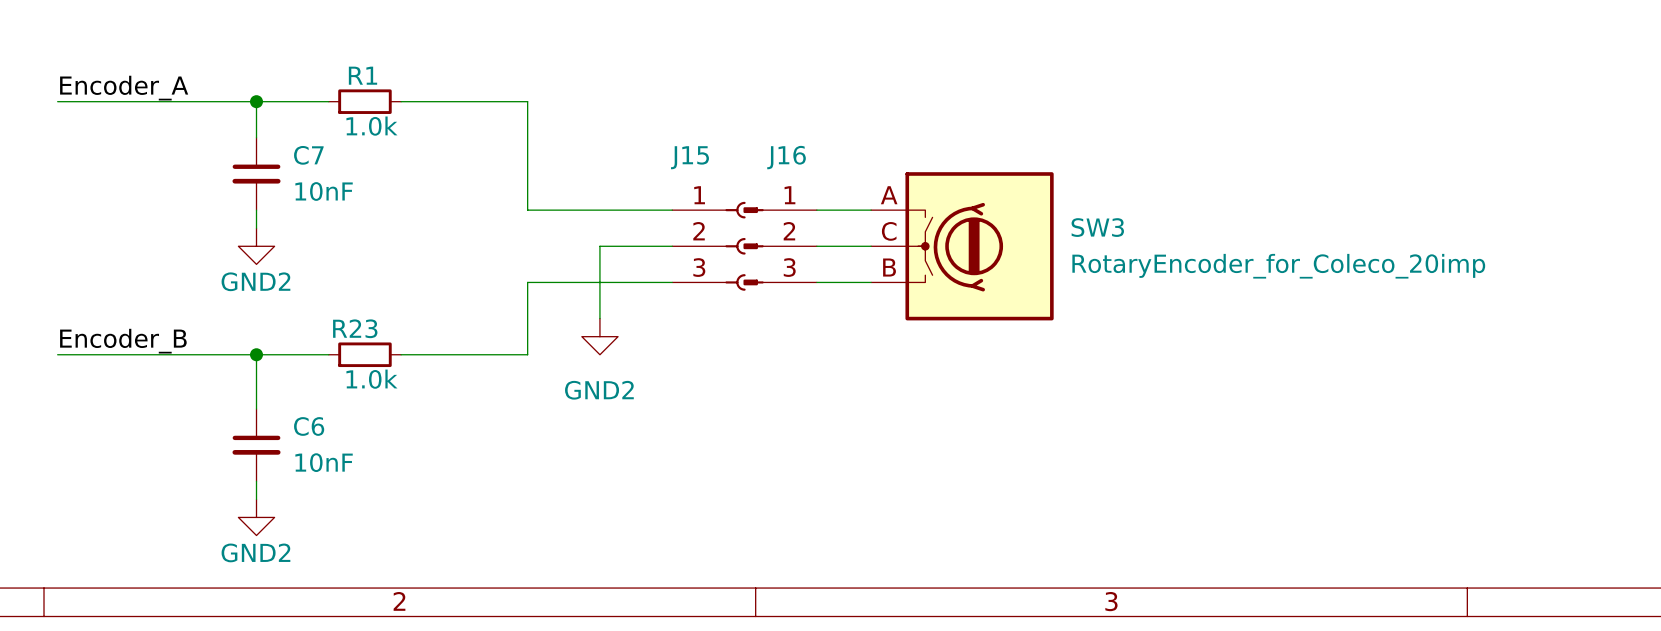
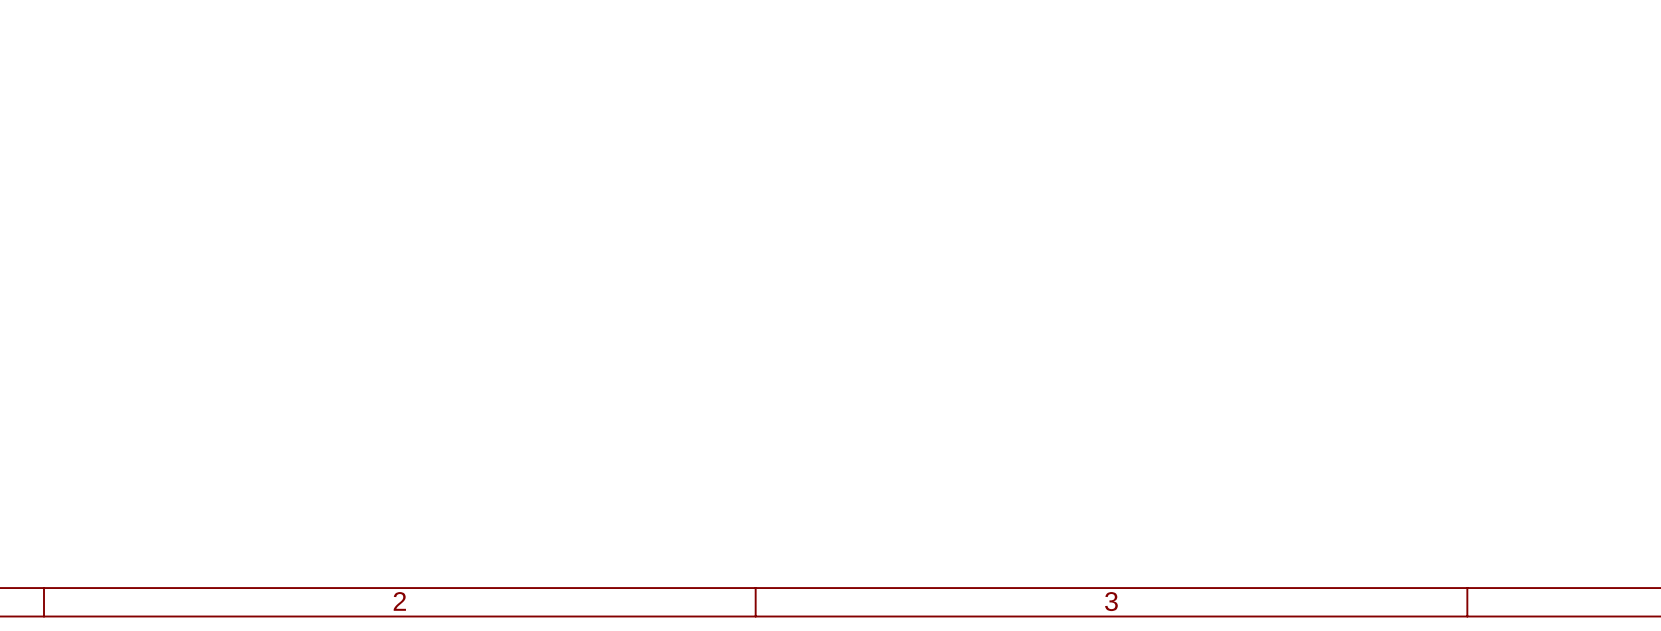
label: Encoder_A (124, 88) -> none
wire: (57, 101) (328, 101) -> none
wire: (256, 101) (256, 137) -> none
junction: (256, 101) -> none
R1: 1.0k (364, 101) -> none
wire: (401, 101) (527, 101) (527, 210) (672, 210) -> none
C7: 10nF (256, 173) -> none
wire: (256, 210) (256, 228) -> none
wire: (816, 210) (871, 210) -> none
power symbol: GND2 (256, 246) -> none
wire: (672, 246) (599, 246) (599, 318) -> none
J15: (708, 246) -> none
J16: (780, 246) -> none
wire: (816, 246) (871, 246) -> none
SW3: RotaryEncoder_for_Coleco_20imp (962, 246) -> none
wire: (672, 282) (527, 282) (527, 354) (401, 354) -> none
wire: (816, 282) (871, 282) -> none
power symbol: GND2 (599, 336) -> none
label: Encoder_B (123, 341) -> none
wire: (57, 354) (328, 354) -> none
wire: (256, 354) (256, 408) -> none
junction: (256, 354) -> none
R23: 1.0k (364, 354) -> none
C6: 10nF (256, 445) -> none
wire: (256, 481) (256, 499) -> none
power symbol: GND2 (256, 517) -> none

